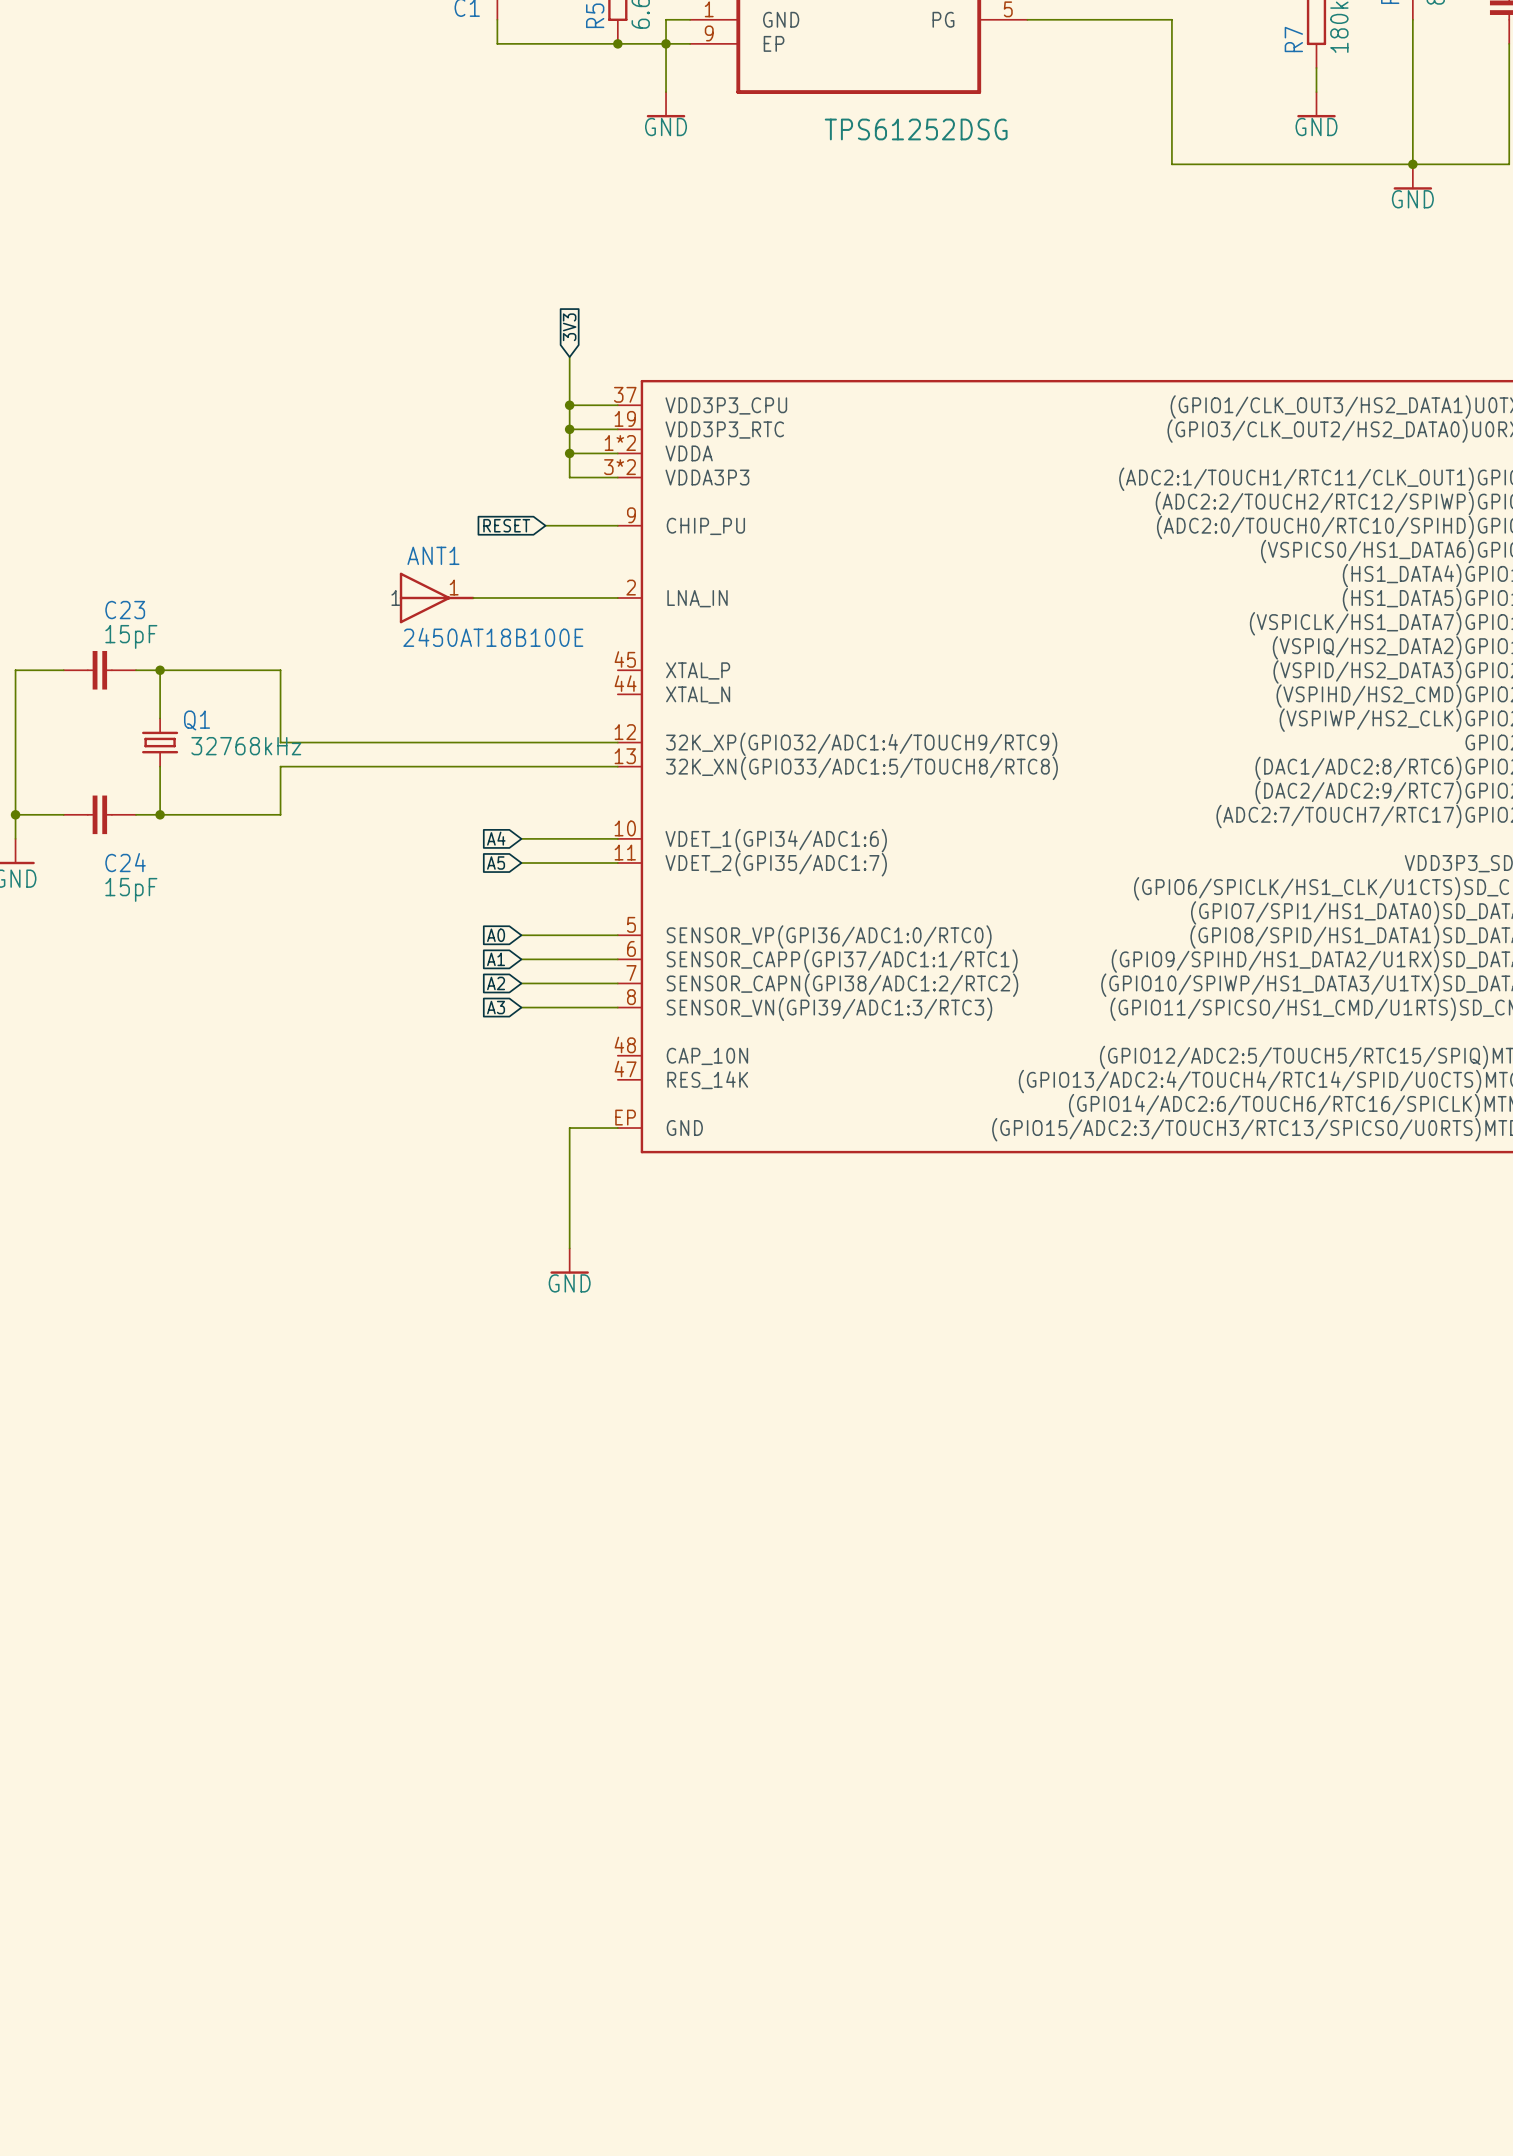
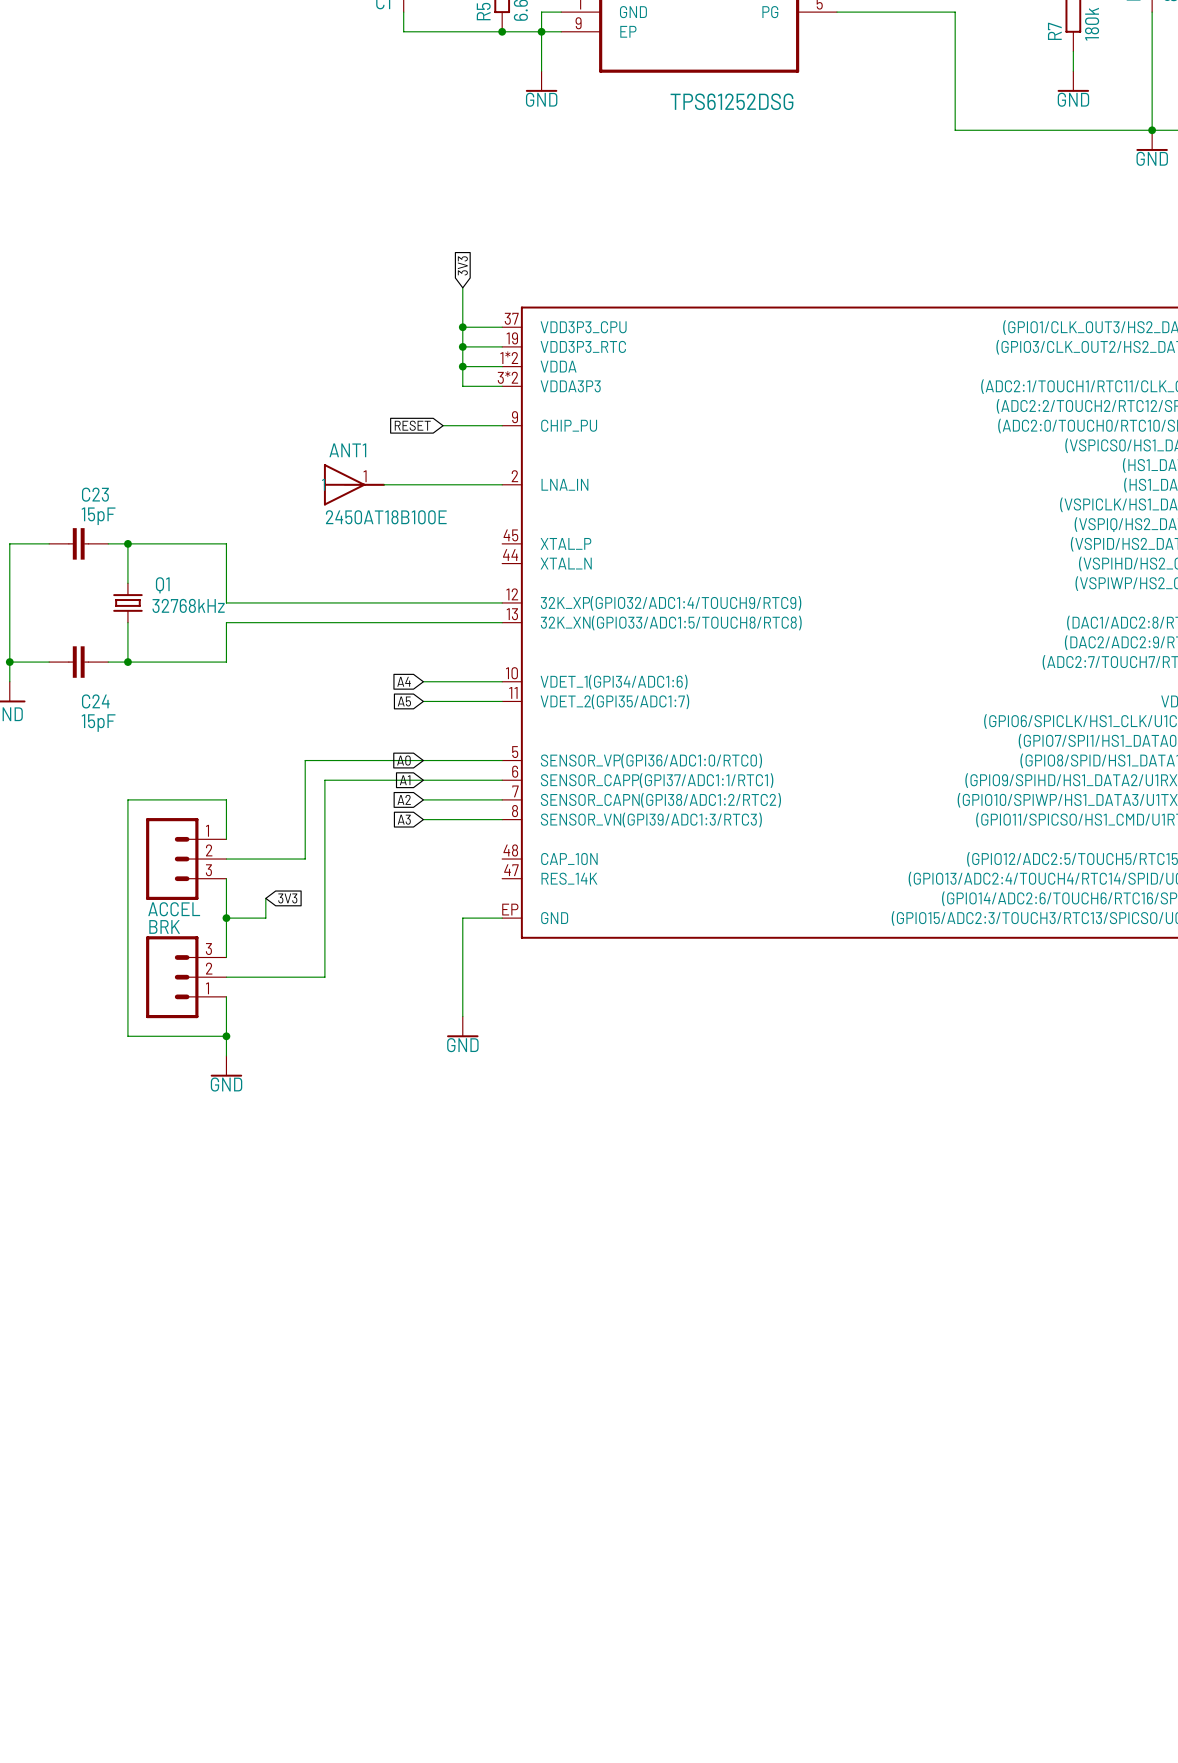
wire: none -> (423, 760) (305, 760) (305, 859) (226, 859)
wire: none -> (423, 780) (324, 780) (324, 977) (226, 977)
wire: none -> (226, 839) (226, 799) (127, 799) (127, 1036) (226, 1036)
ACCEL: none -> (186, 859)
wire: none -> (226, 878) (226, 957)
wire: none -> (265, 898) (265, 918) (226, 918)
global label: none -> 3V3 (287, 898)
junction: none -> (226, 918)
BRK: none -> (186, 977)
wire: none -> (226, 996) (226, 1055)
junction: none -> (226, 1036)
power symbol: none -> GND (226, 1066)

